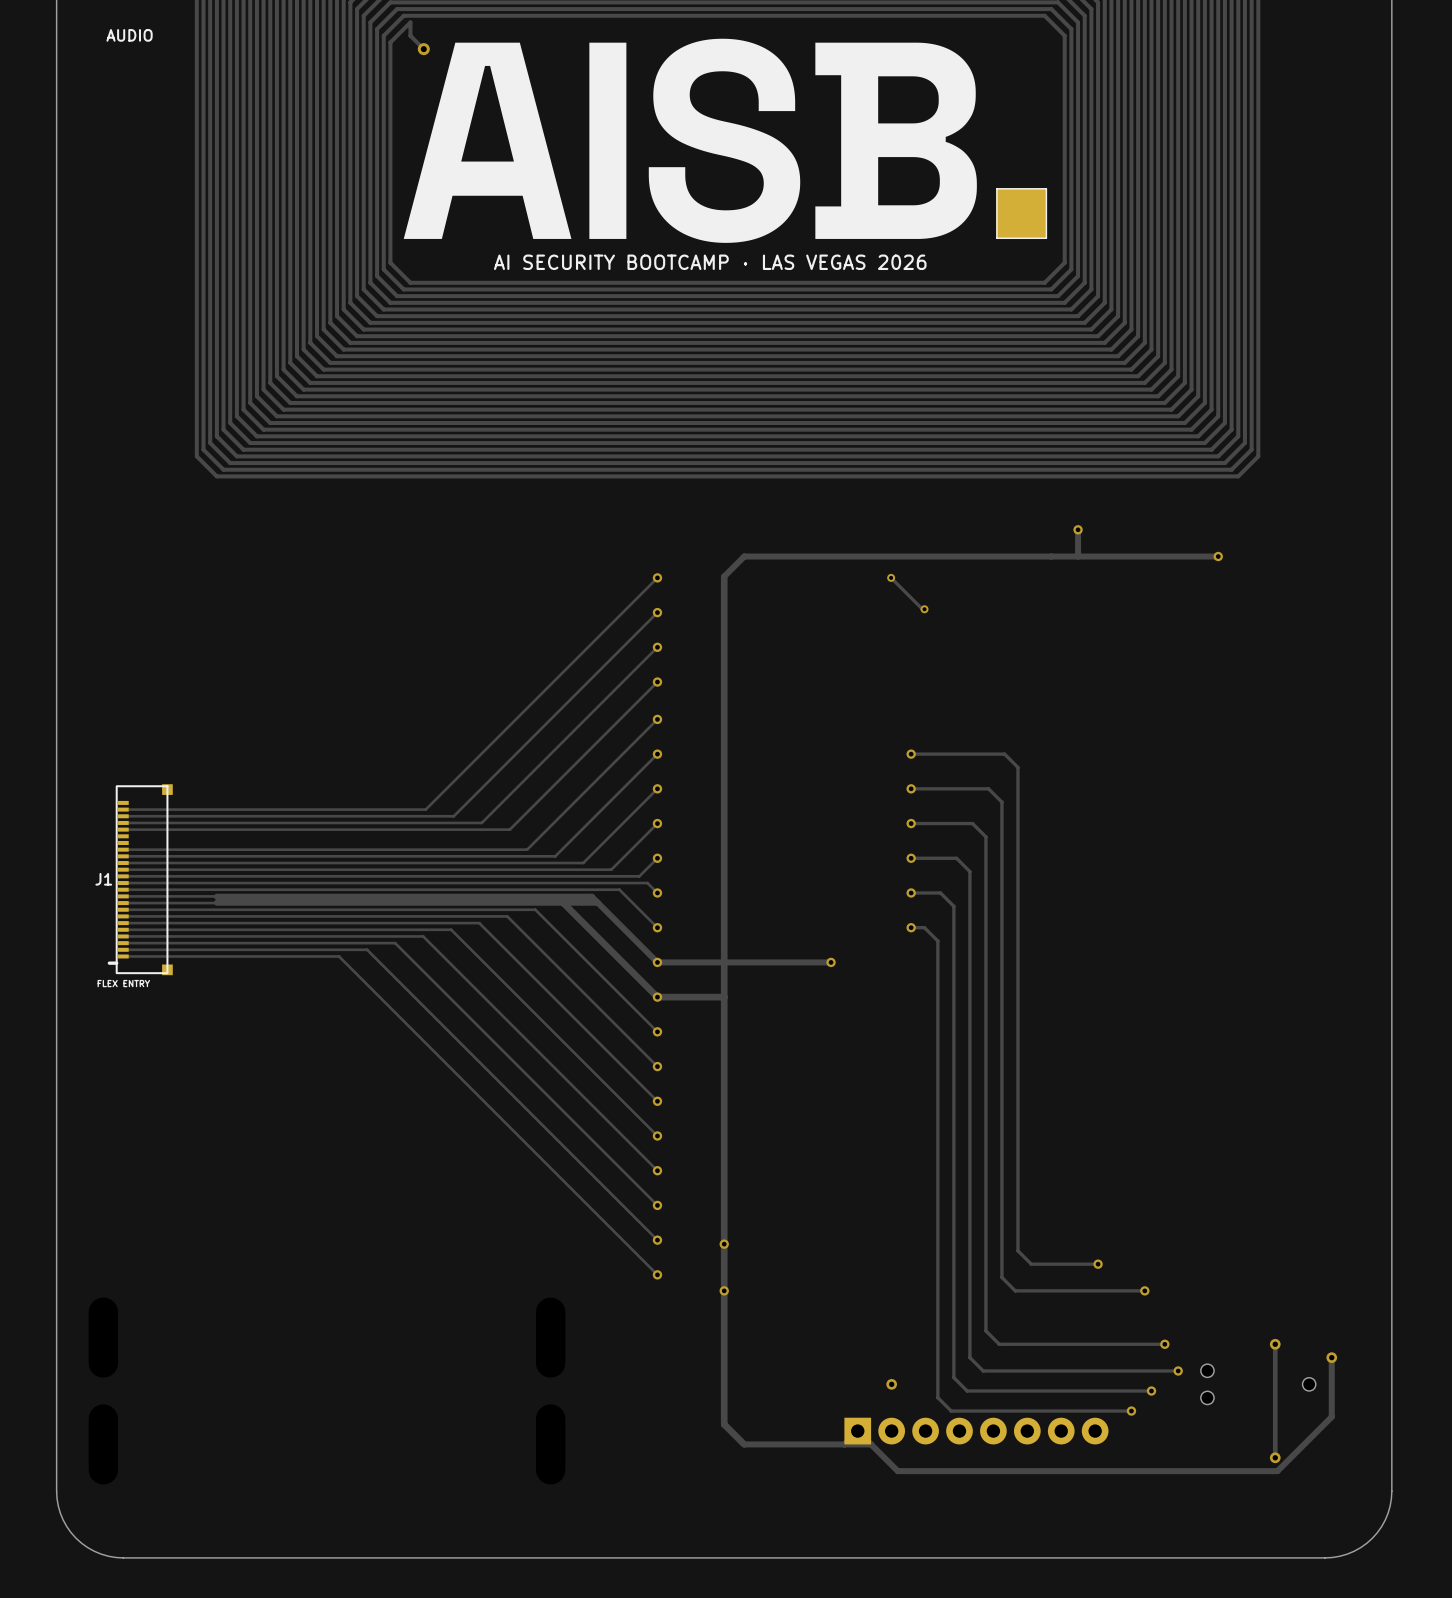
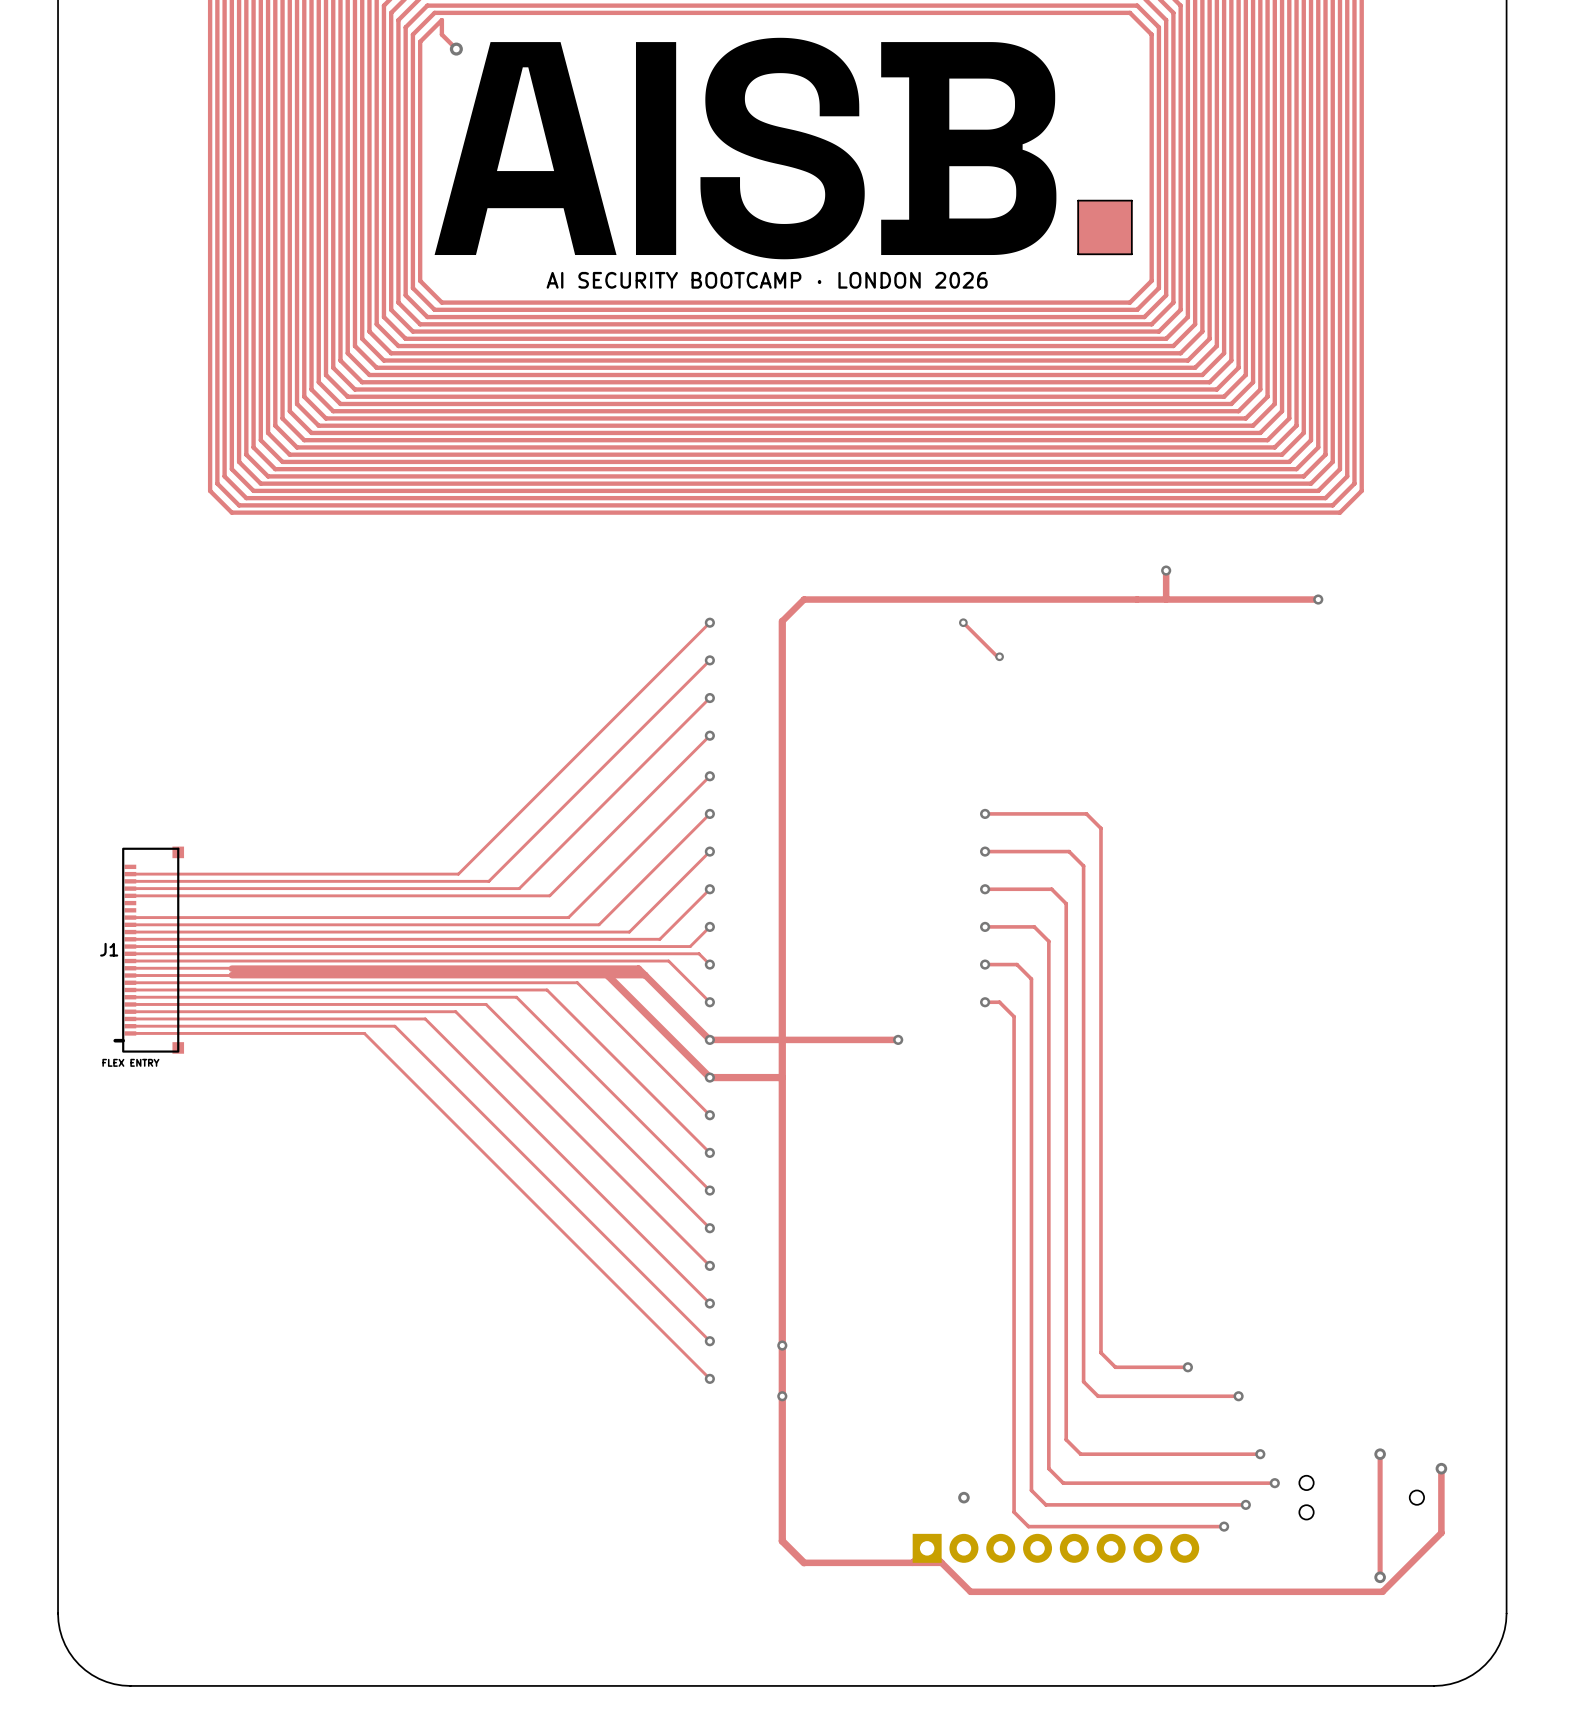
text: AUDIO (129, 35) -> none
text: AI SECURITY BOOTCAMP · LAS VEGAS 2026 (710, 262) -> AI SECURITY BOOTCAMP · LONDON 2026 (767, 280)

